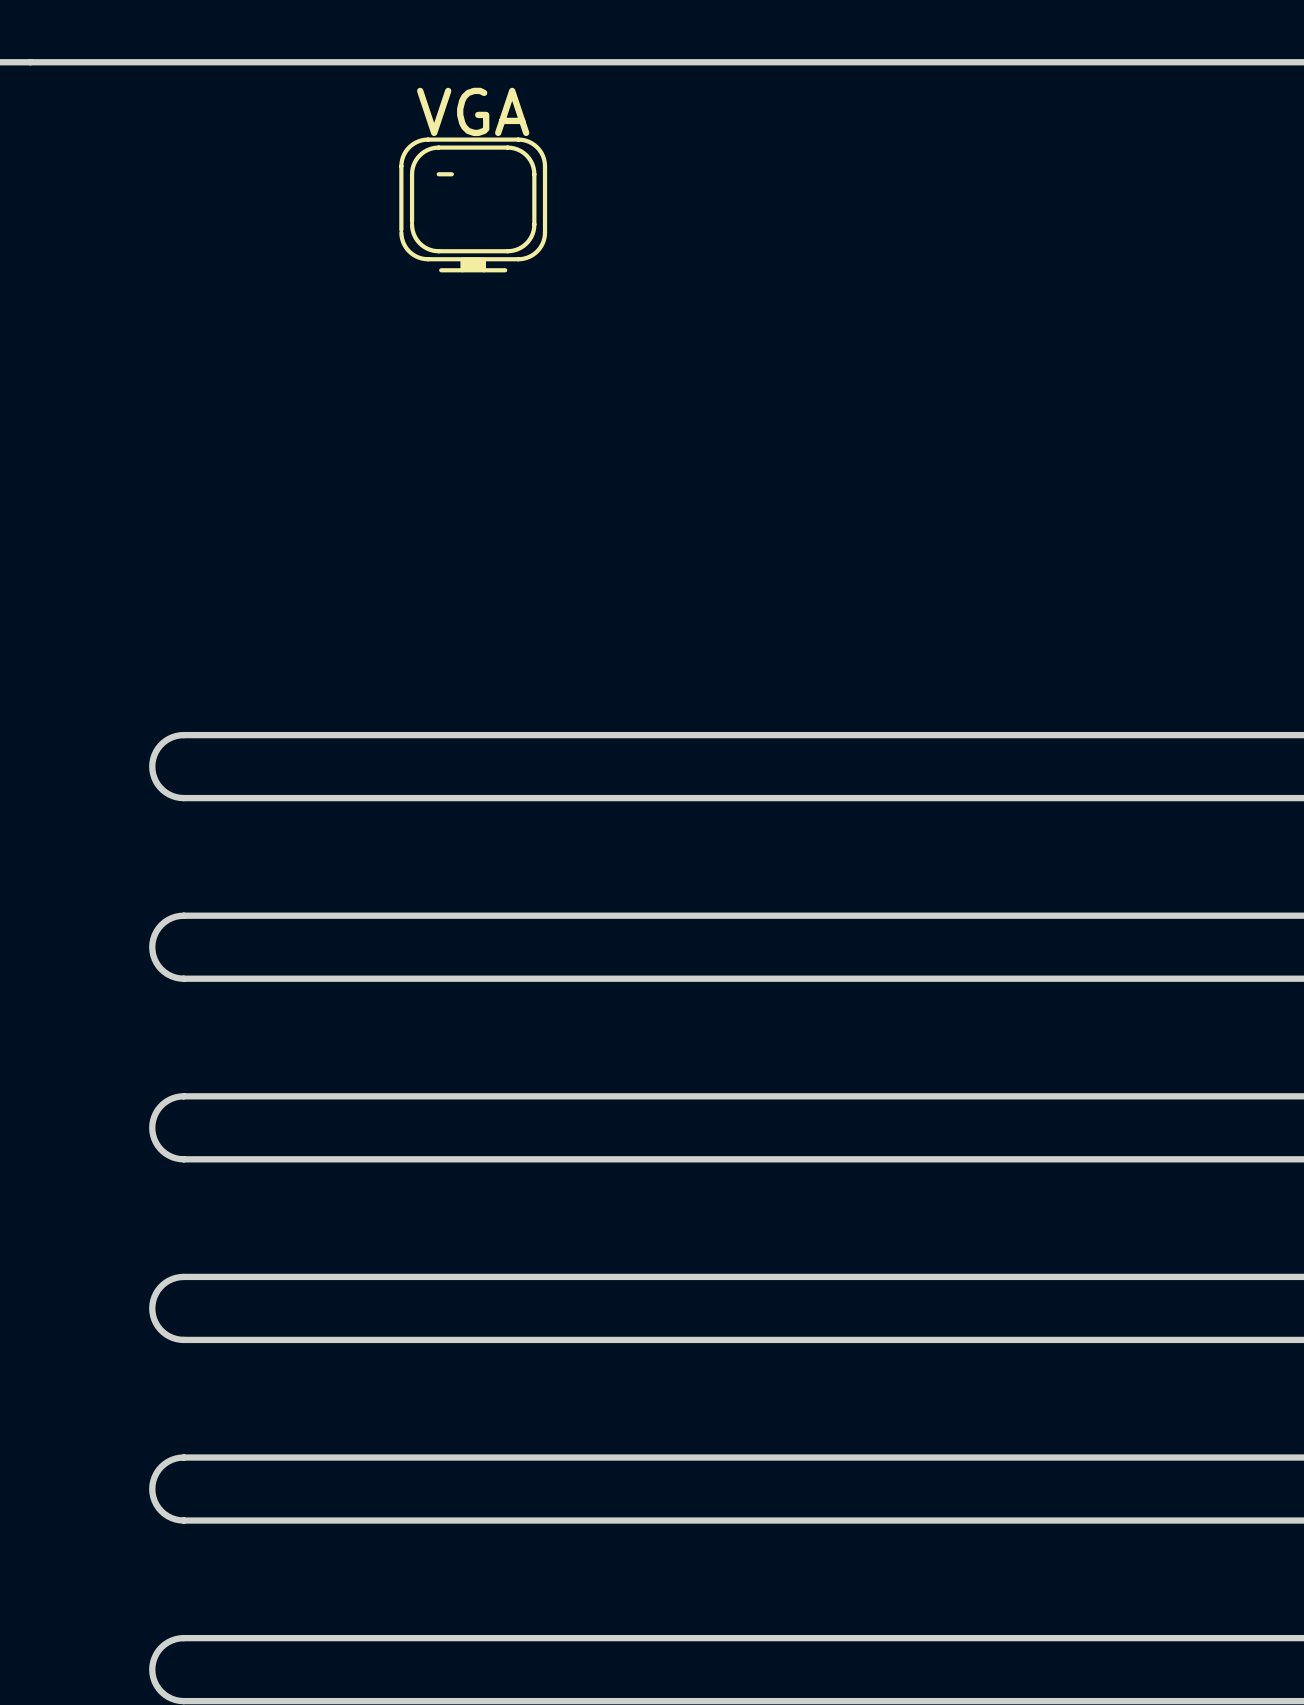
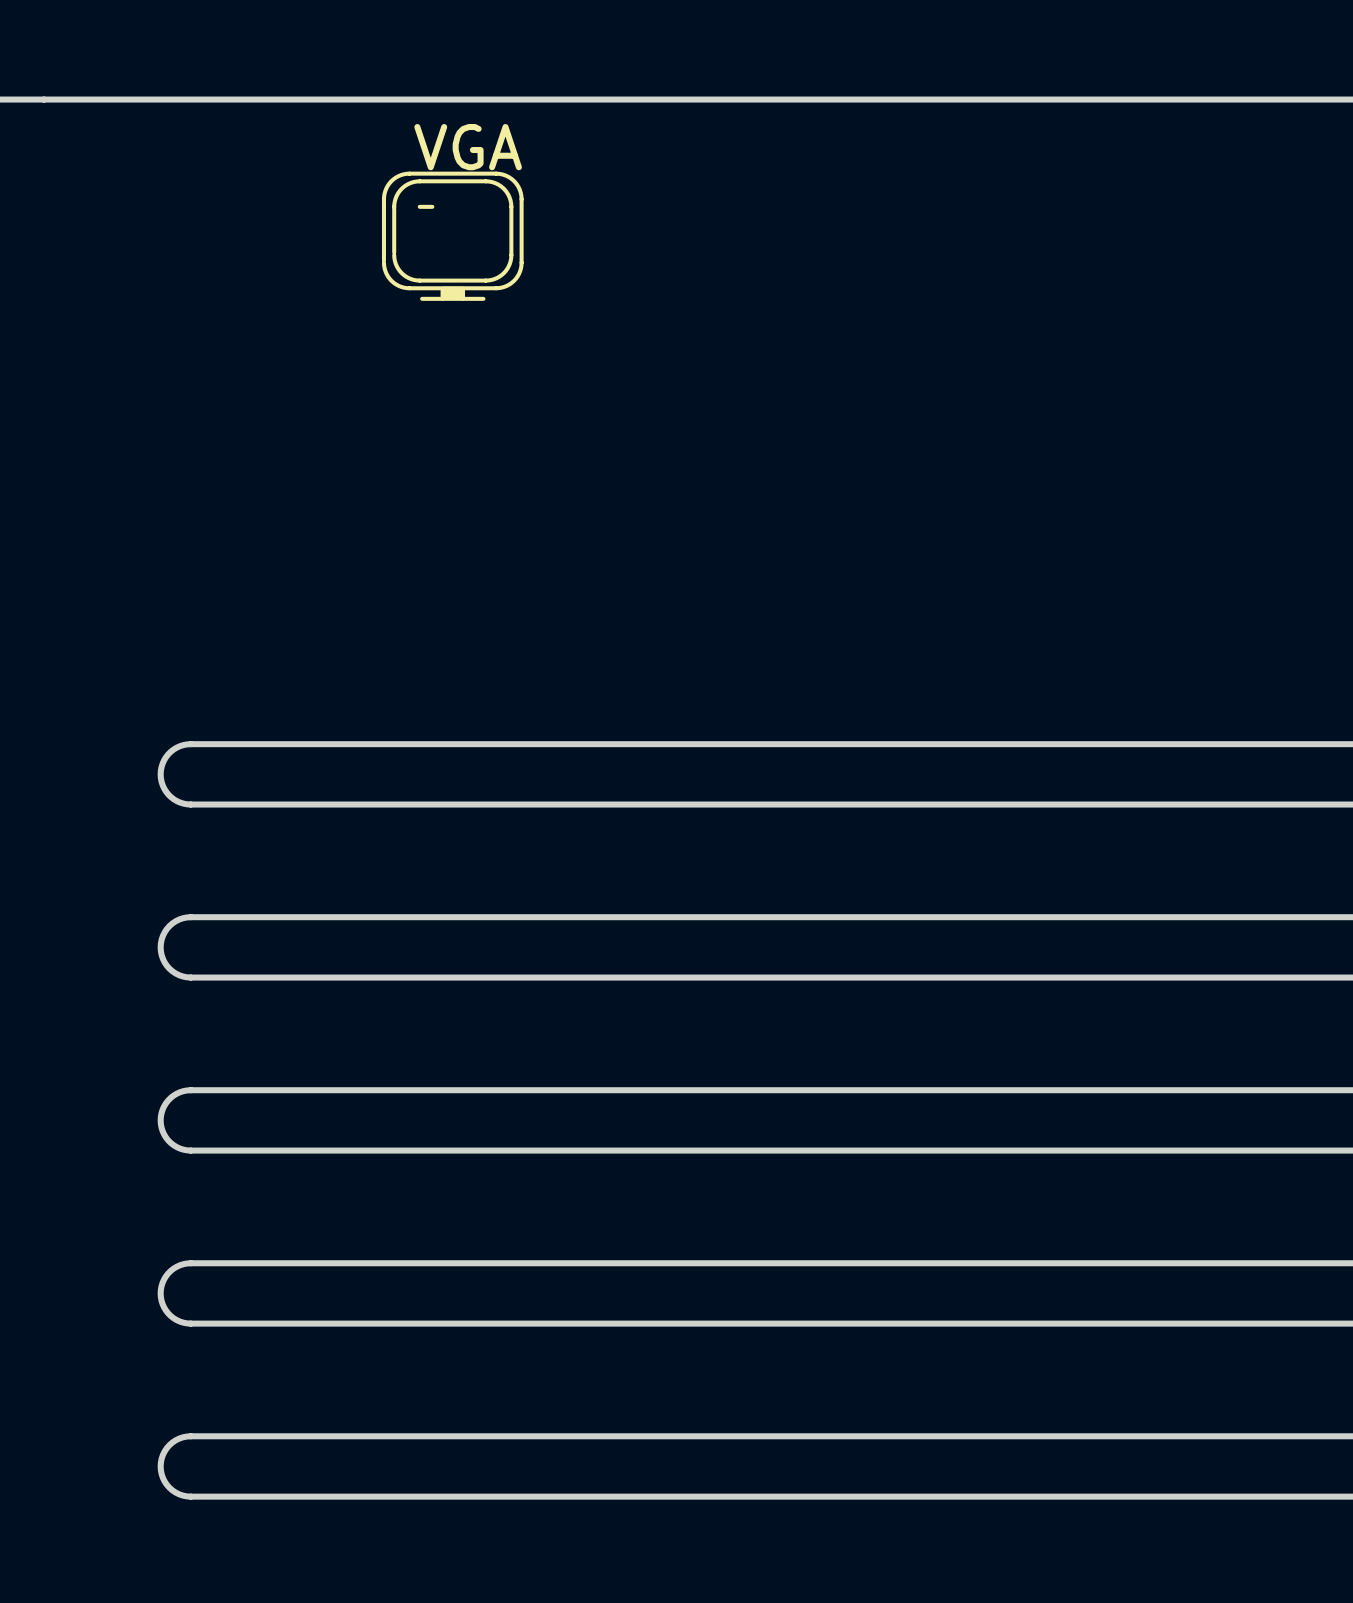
drawing position: (473, 204) -> (452, 236)

